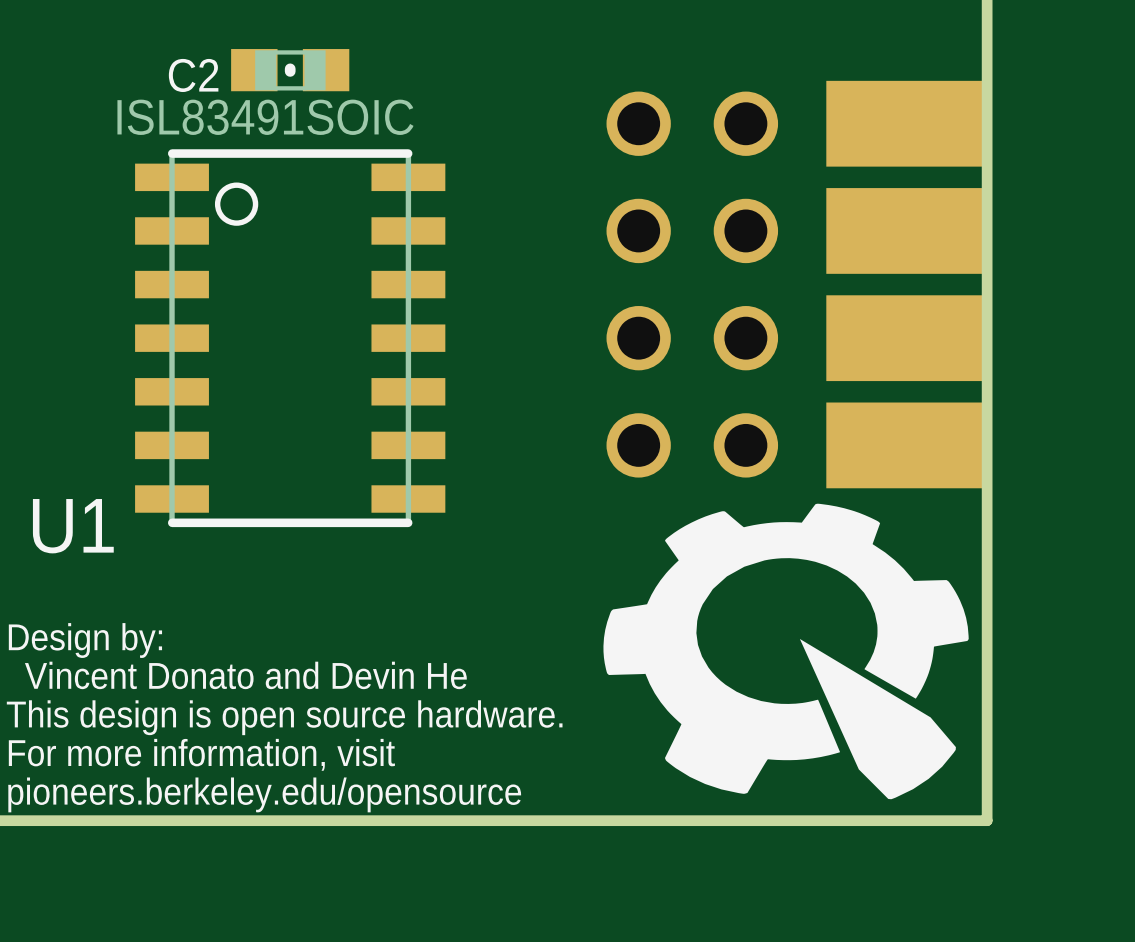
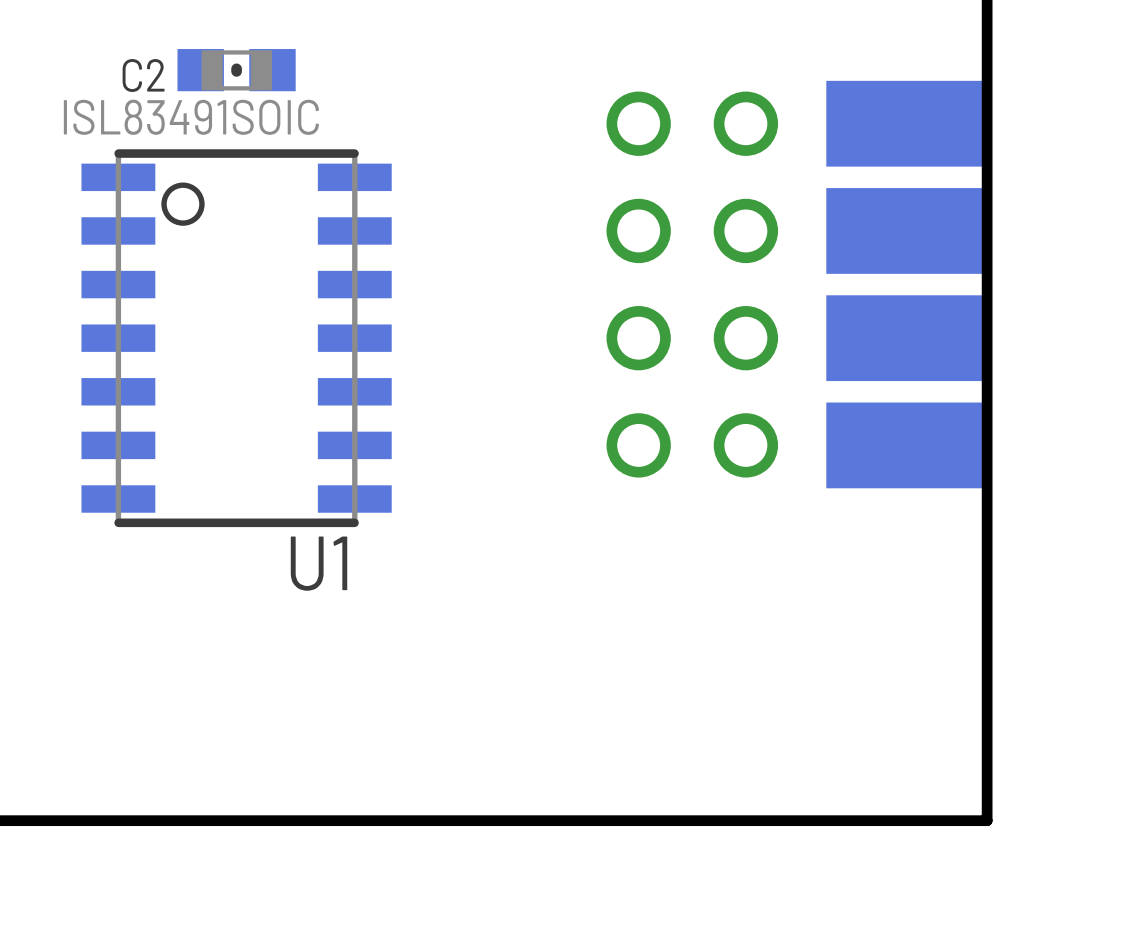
C2 position: (290, 70) -> (236, 70)
U1 position: (290, 338) -> (236, 338)
drawing: [603, 503, 969, 800] -> none
U1 name position: U1 (73, 526) -> U1 (319, 563)
text: Design by: (85, 640) -> none
text: Vincent Donato and Devin He (245, 675) -> none
text: This design is open source hardware. (284, 717) -> none
text: For more information, visit (201, 754) -> none
text: pioneers.berkeley.edu/opensource (264, 794) -> none

